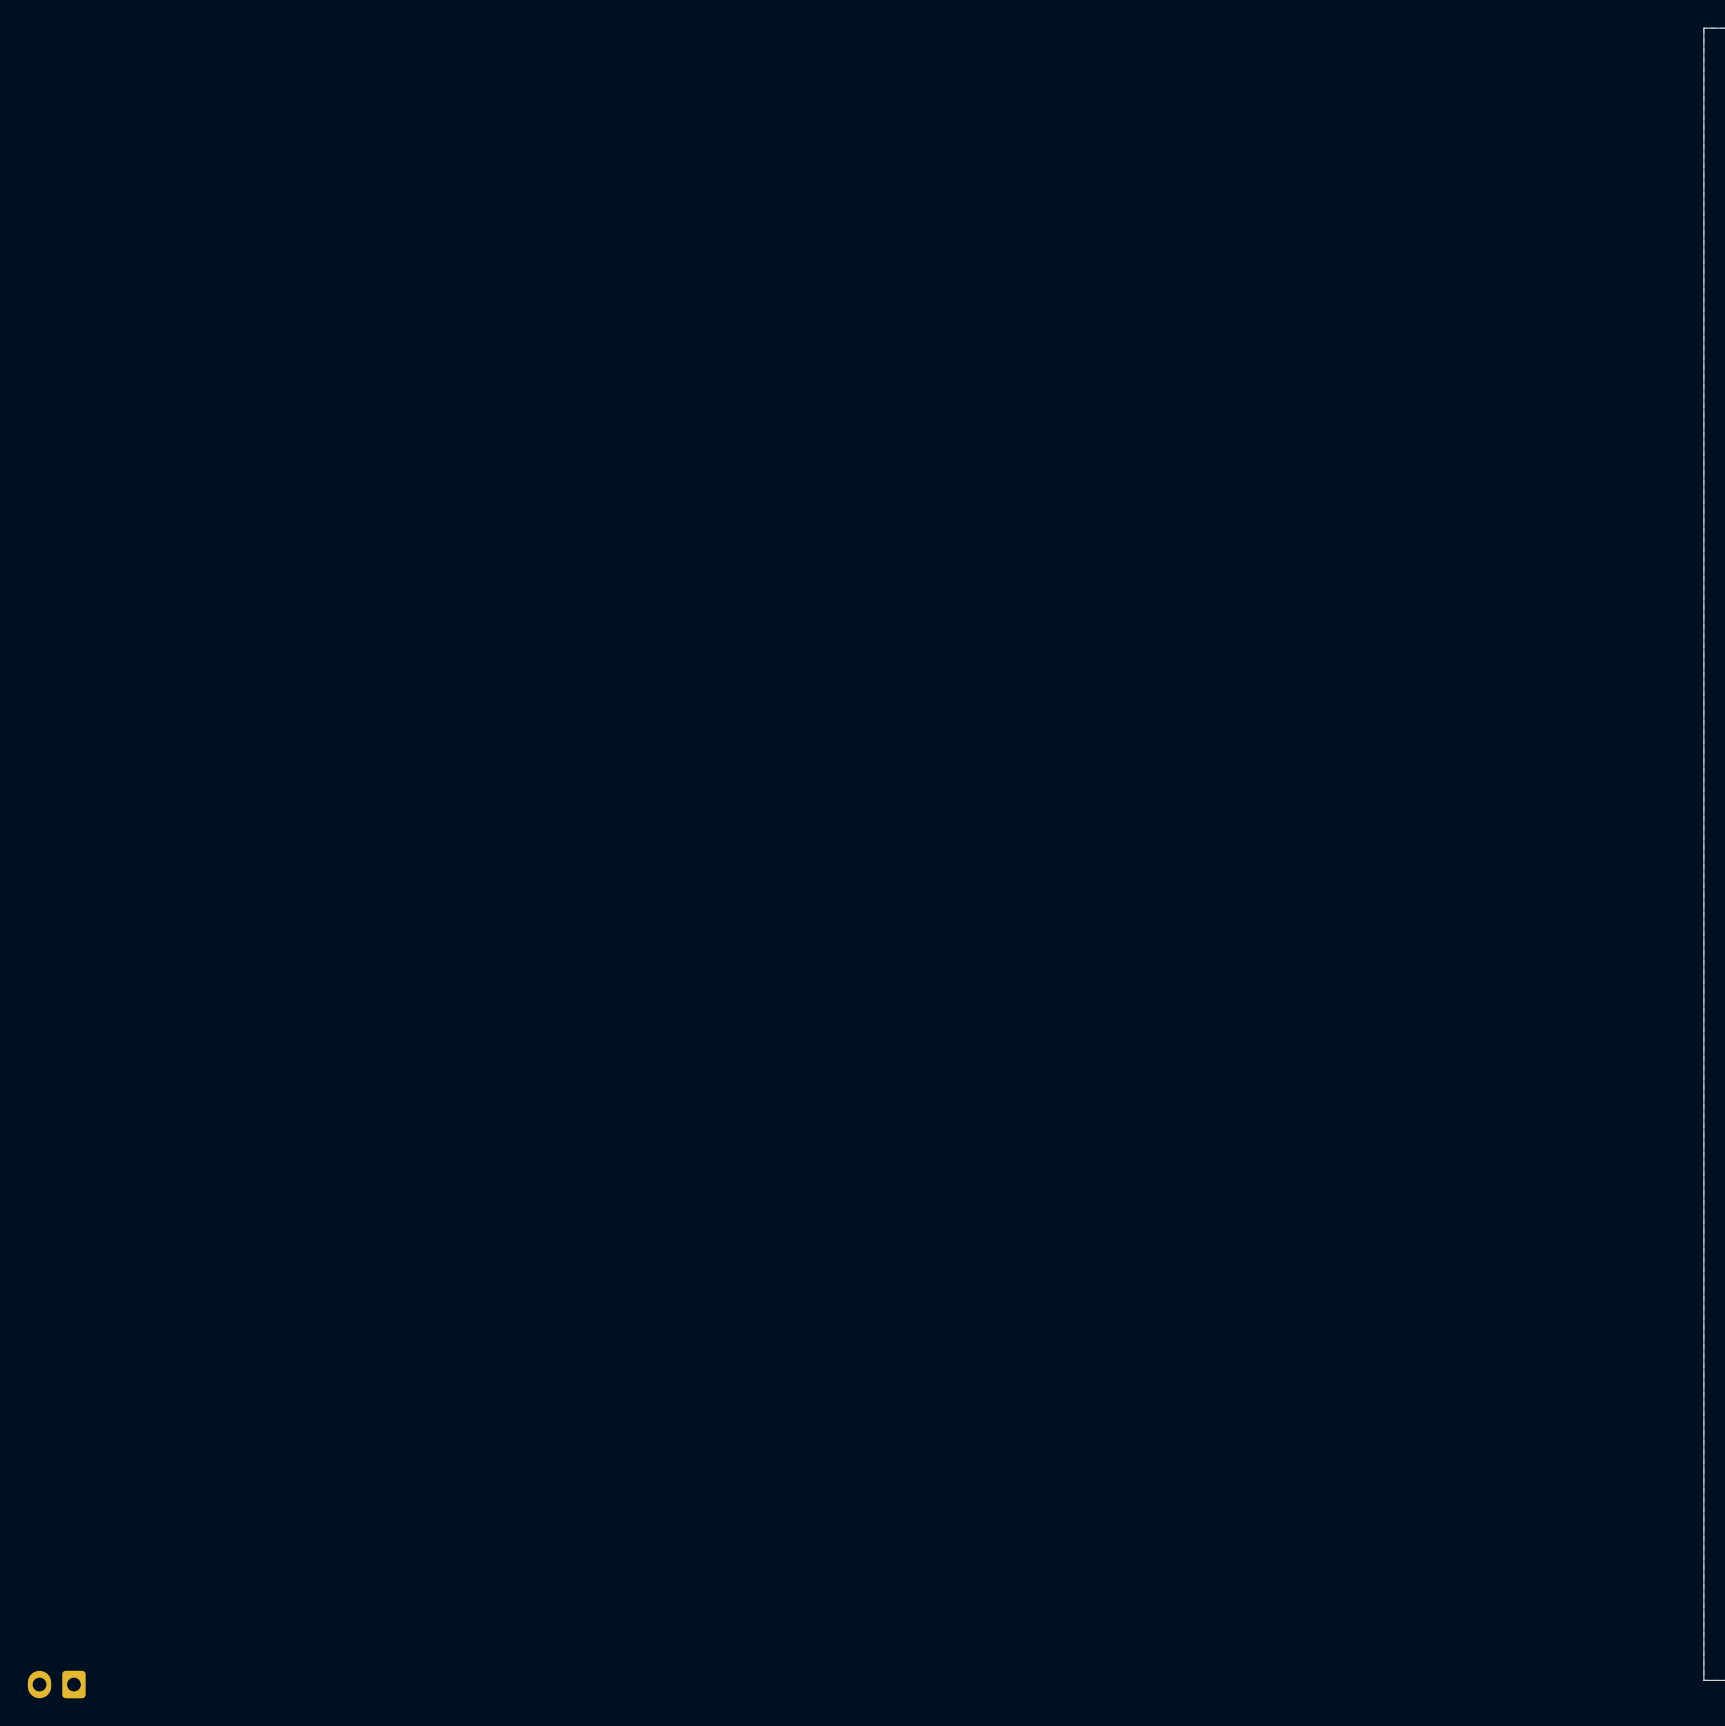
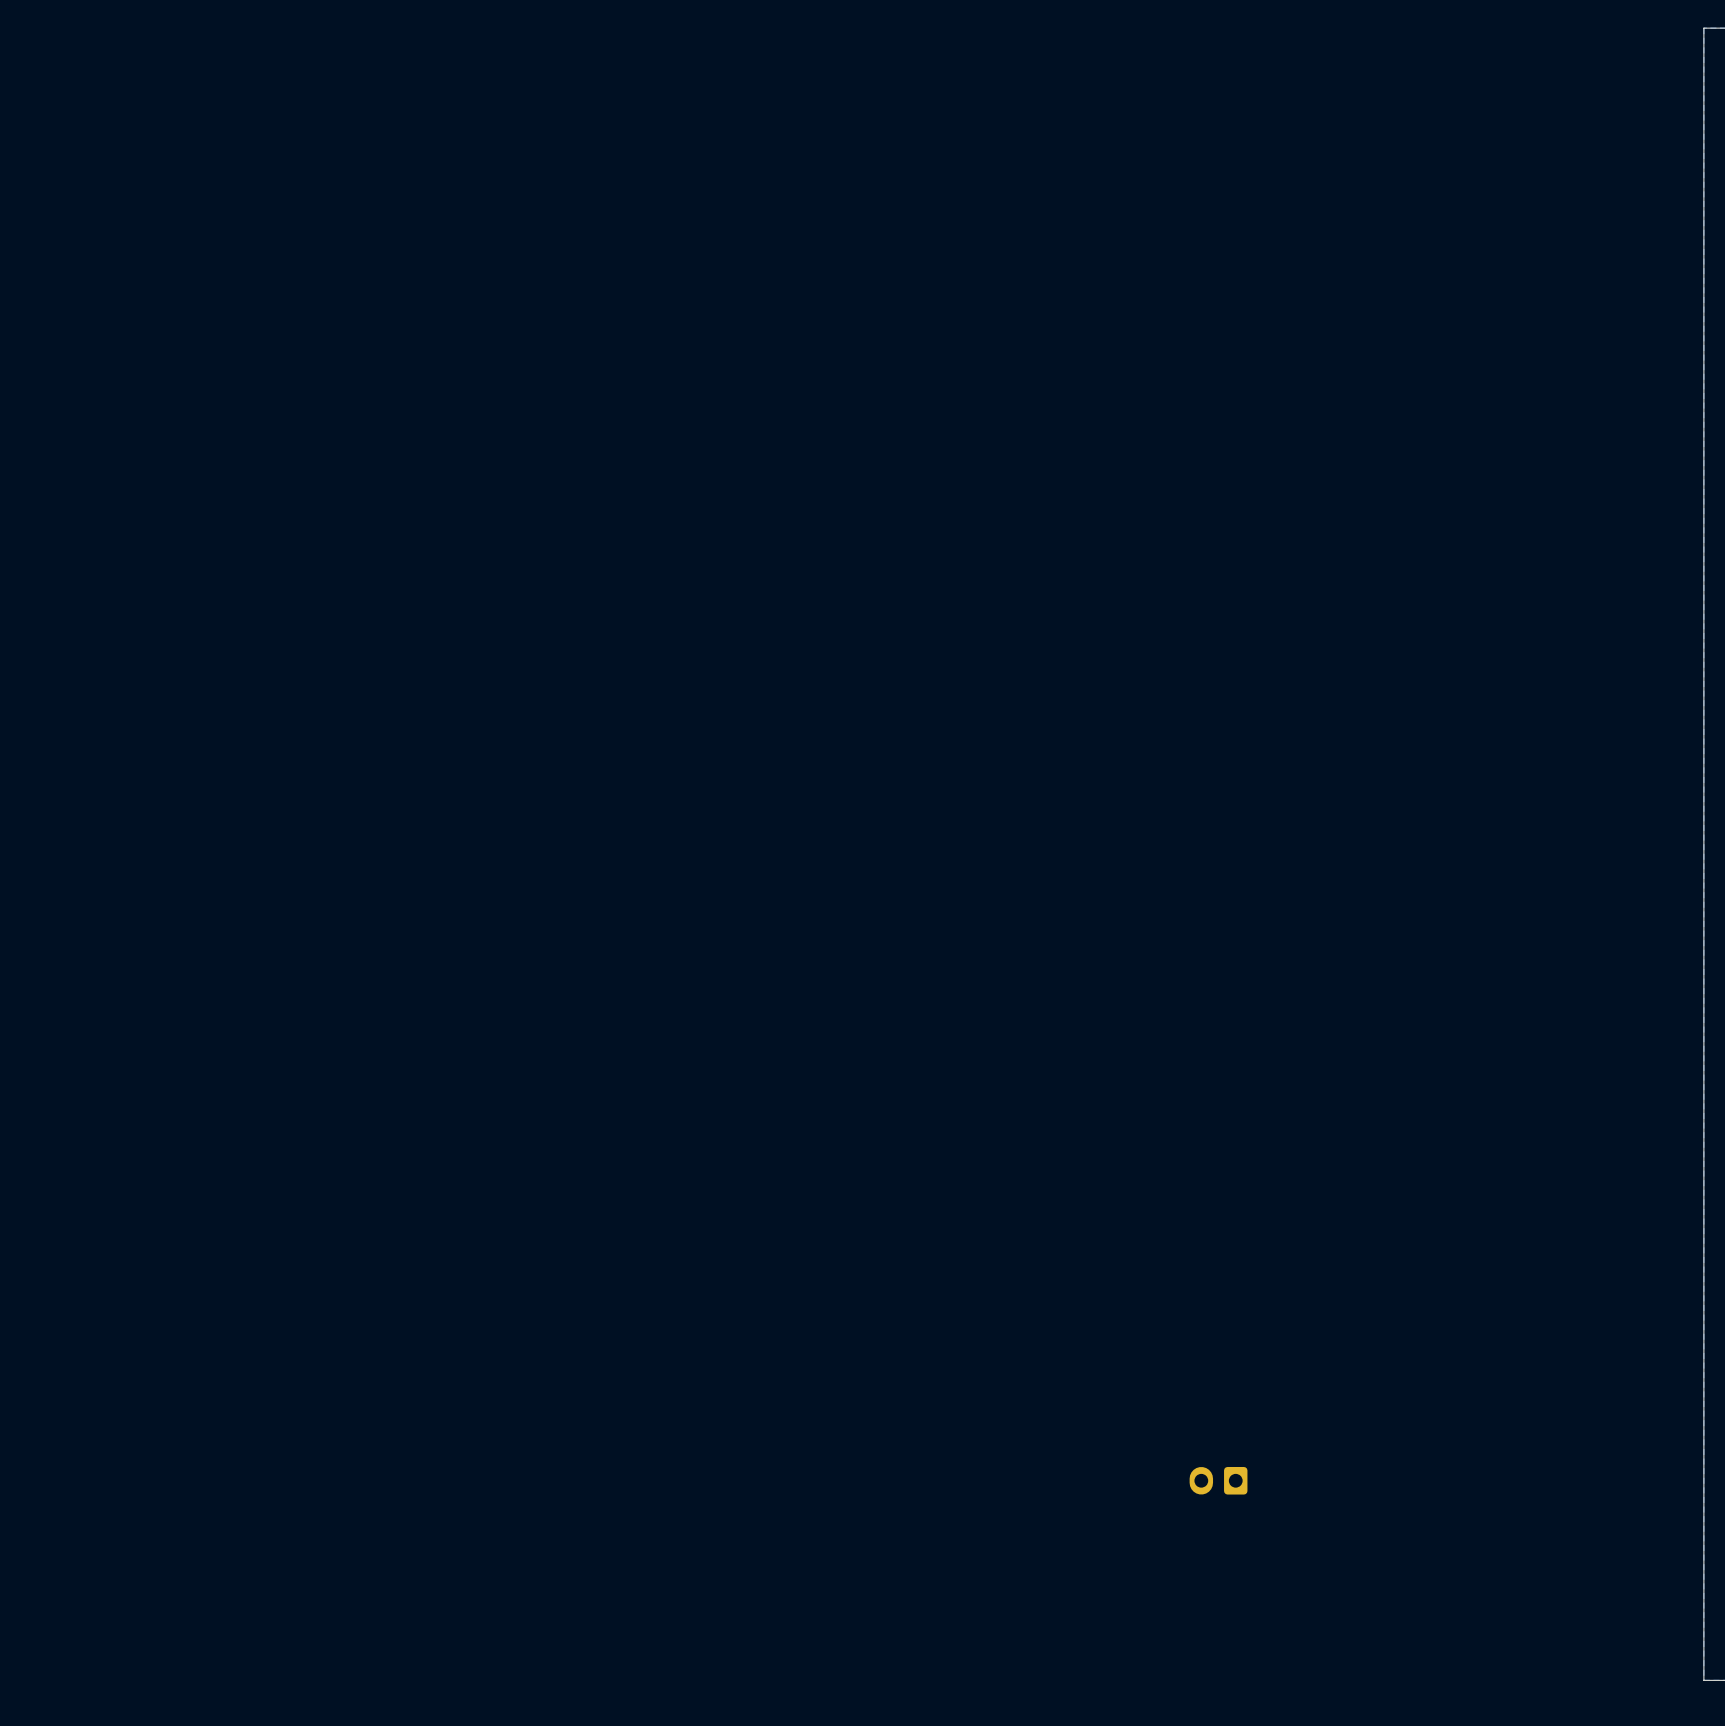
part: none -> (1218, 1480)
part: (56, 1684) -> none

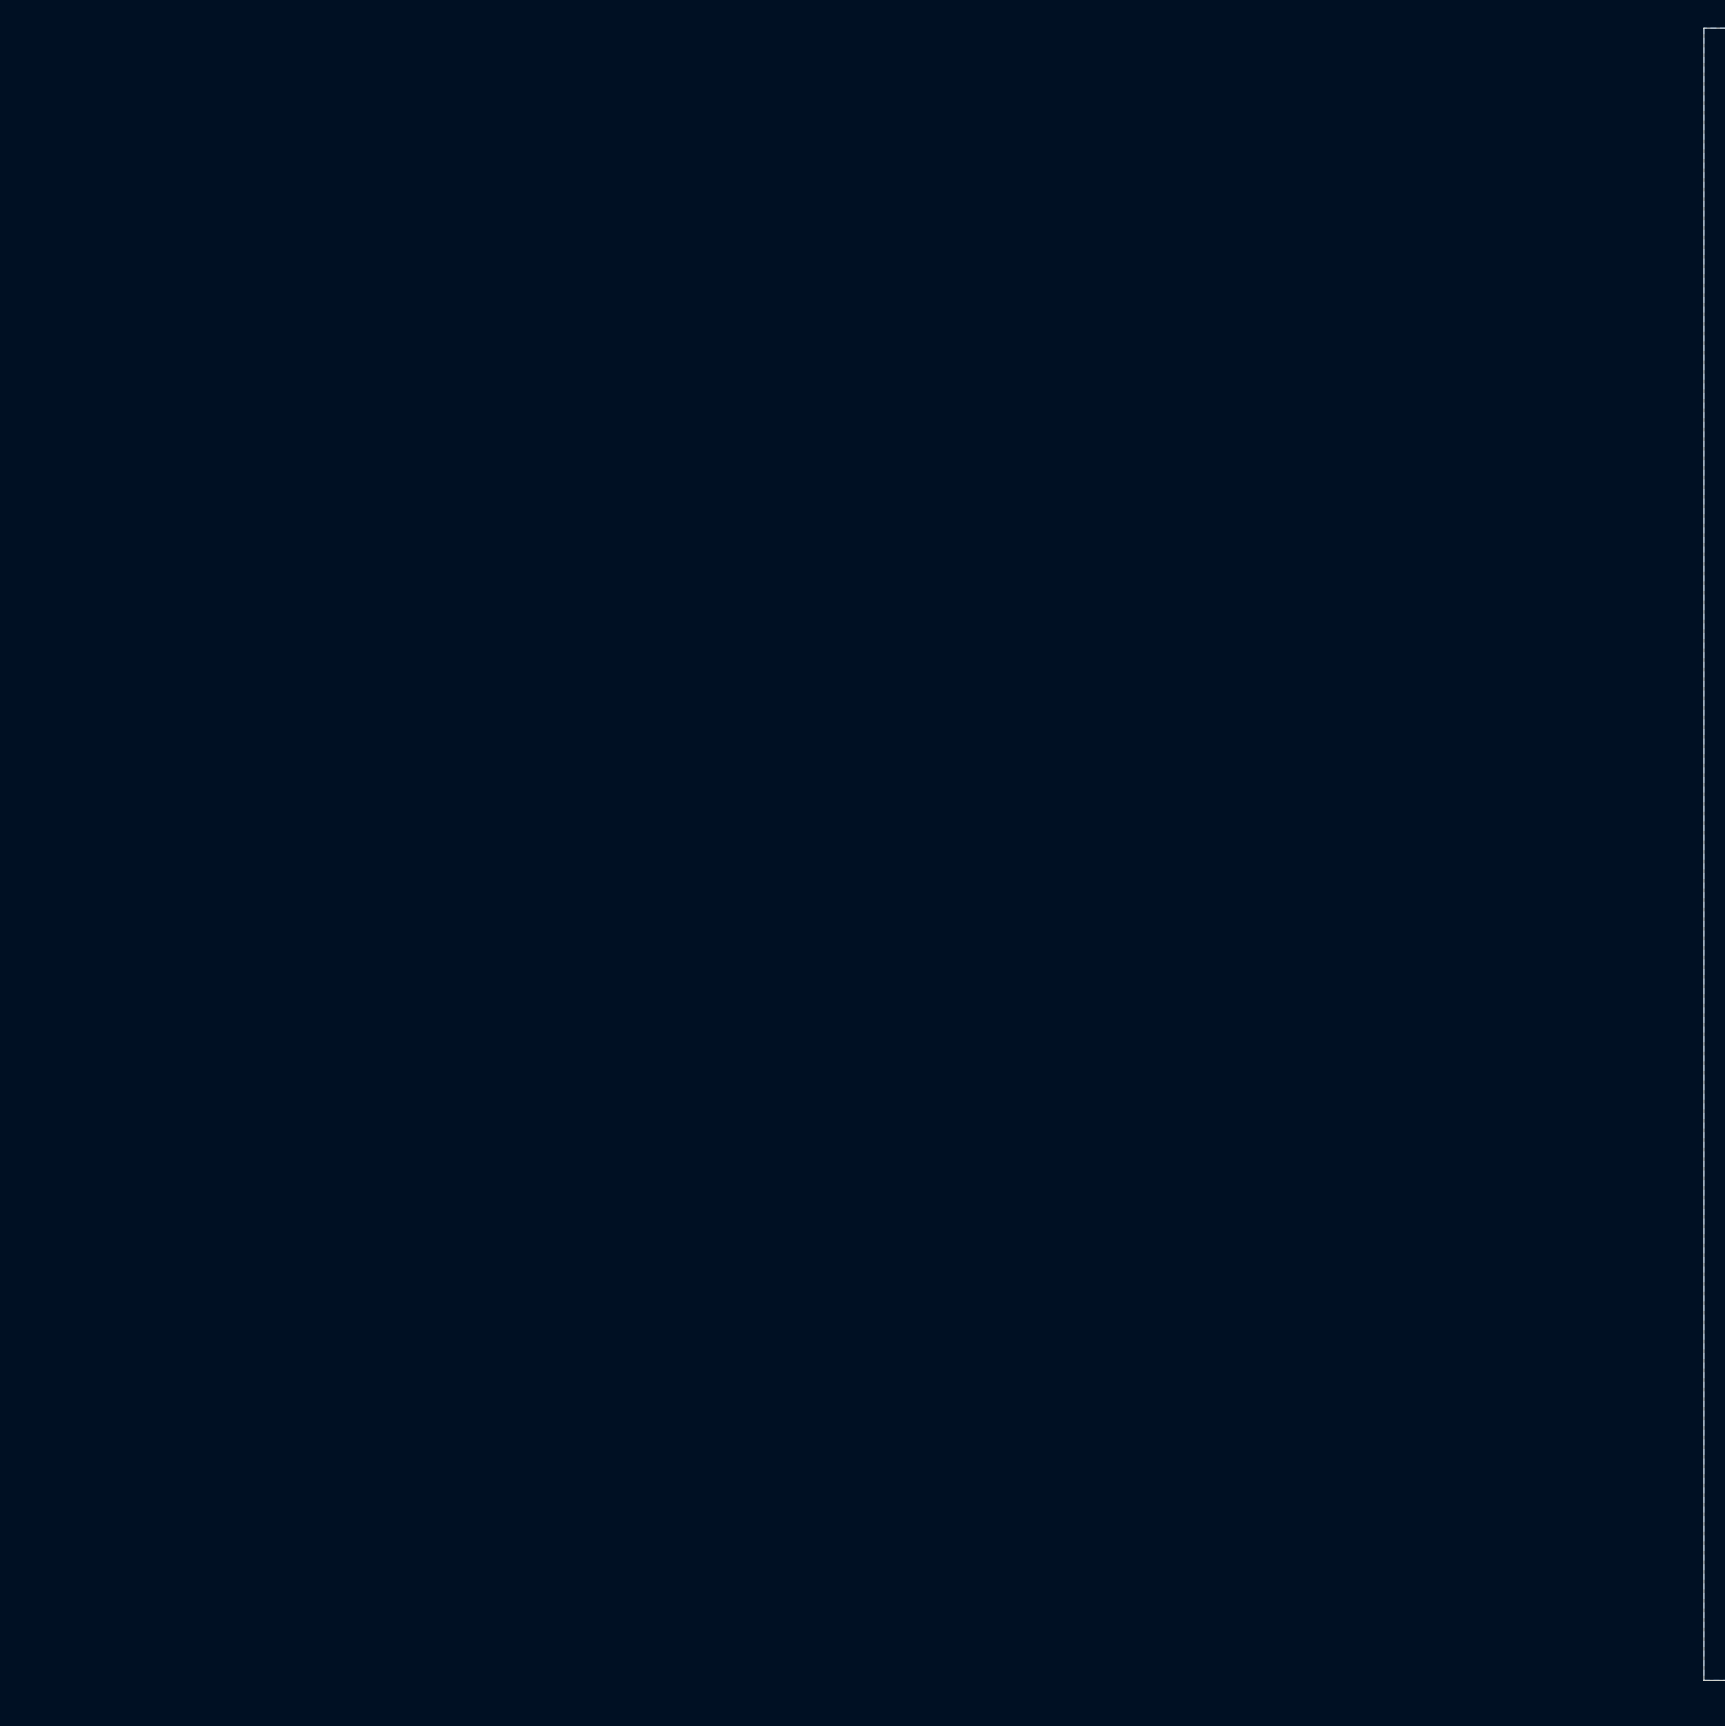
part: (1218, 1480) -> none

